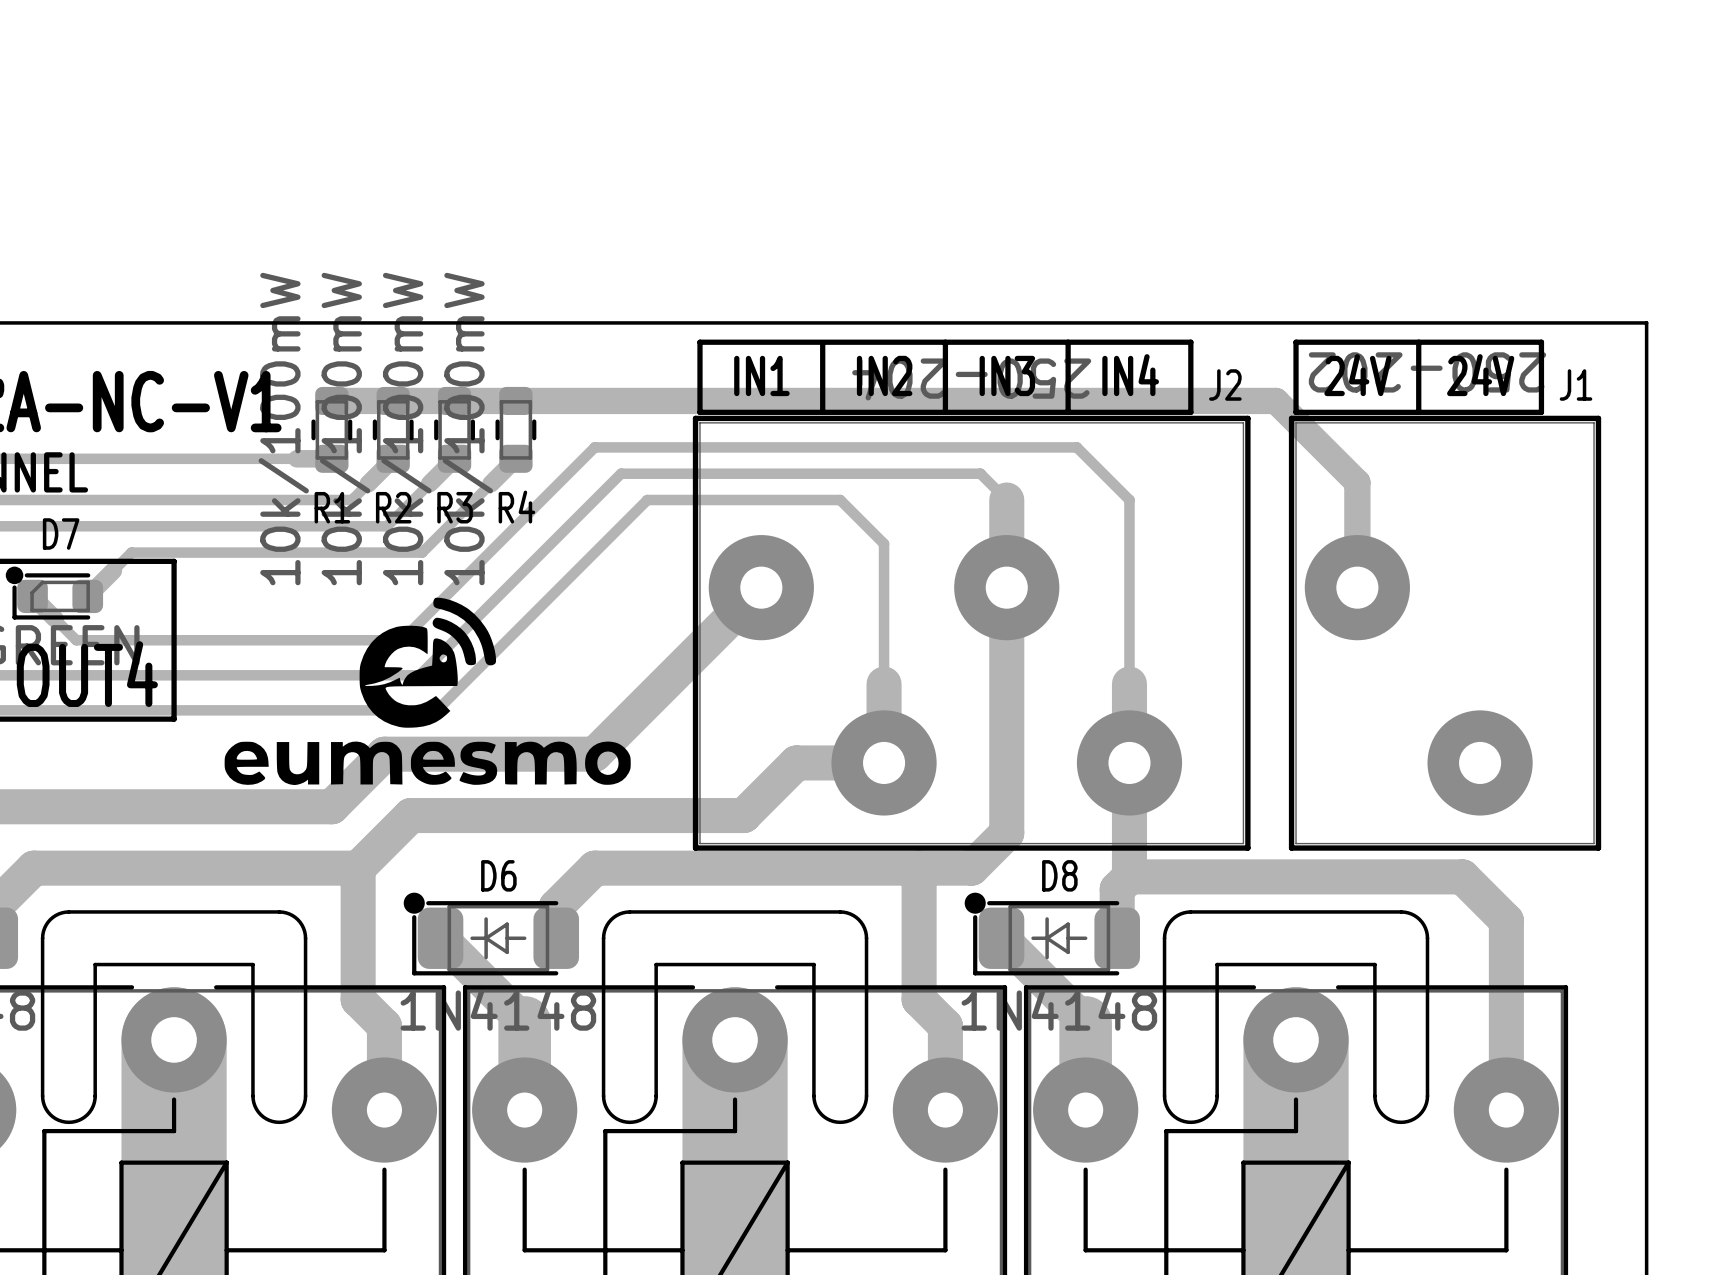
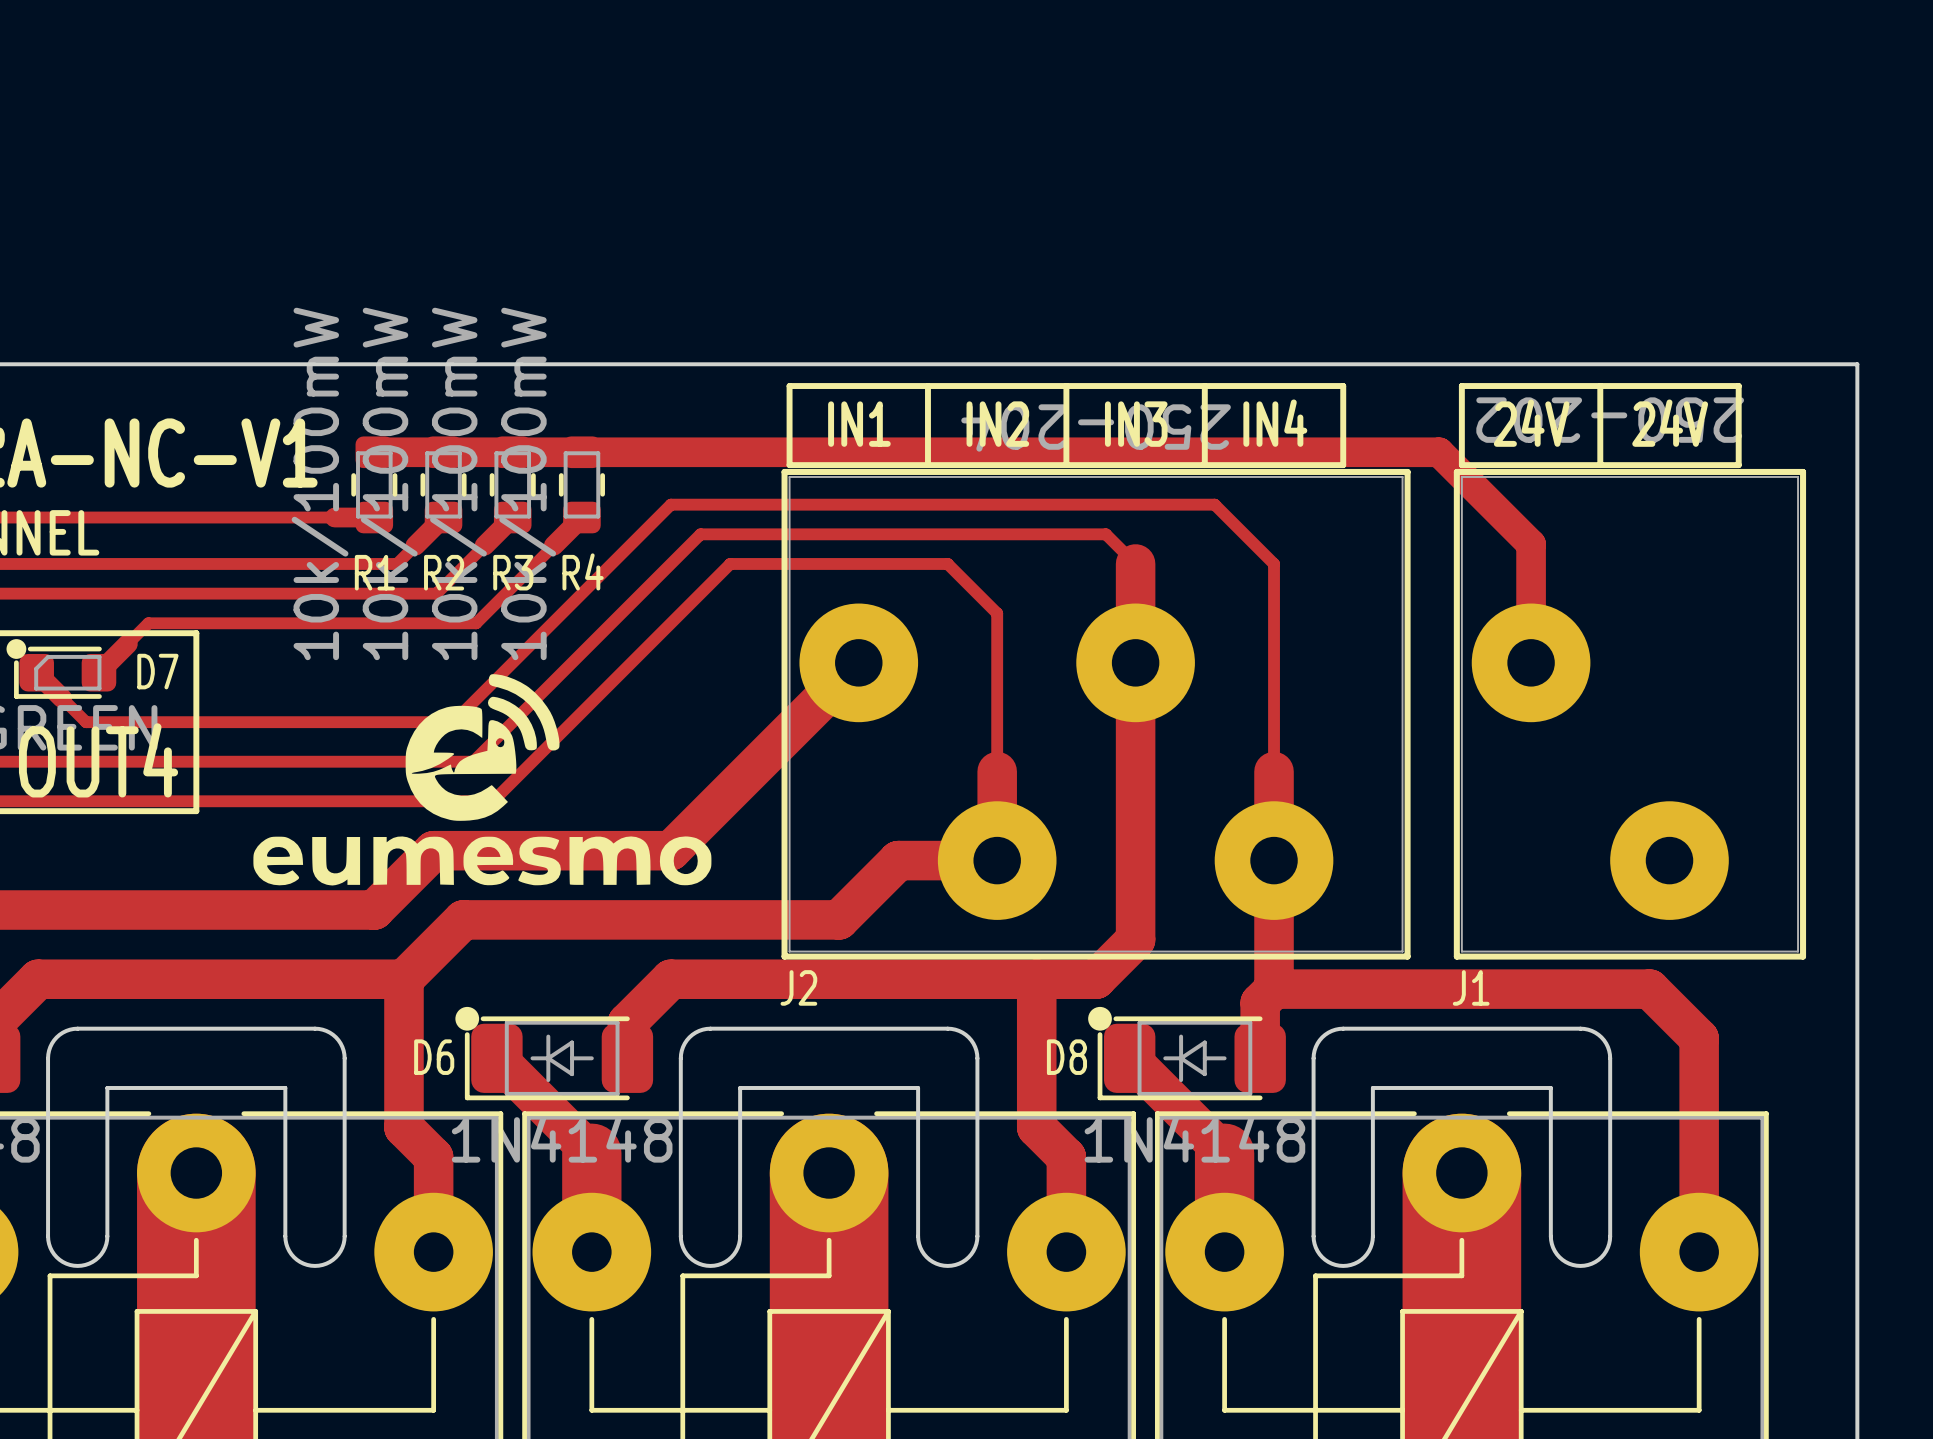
J2 name position: J2 (1225, 385) -> J2 (798, 987)
J1 name position: J1 (1576, 385) -> J1 (1471, 987)
D7 name position: D7 (61, 534) -> D7 (157, 671)
D6 name position: D6 (498, 875) -> D6 (434, 1057)
D8 name position: D8 (1059, 875) -> D8 (1066, 1057)

